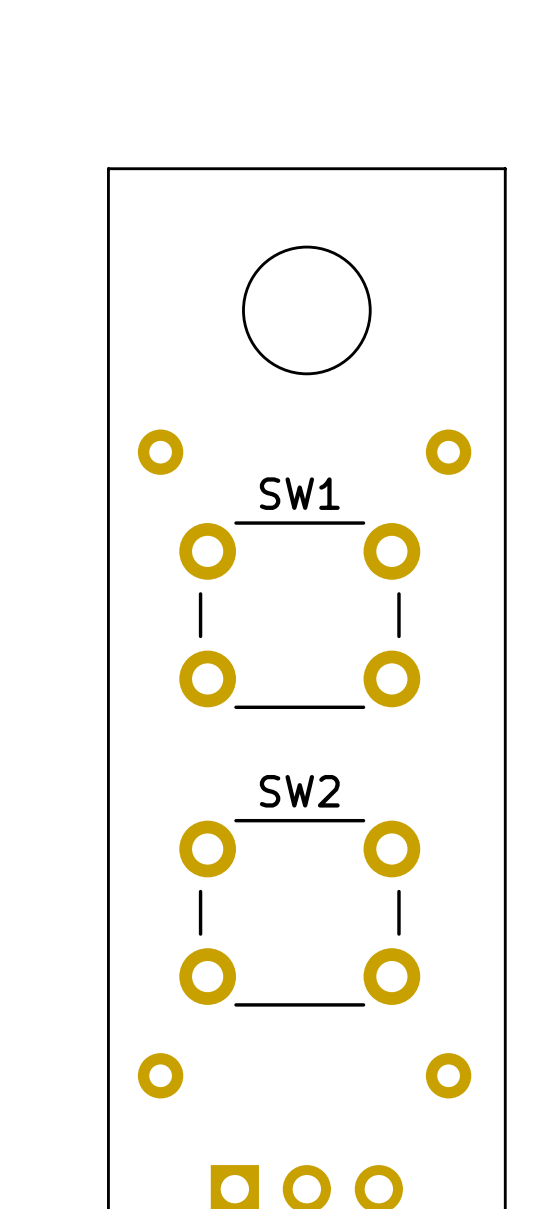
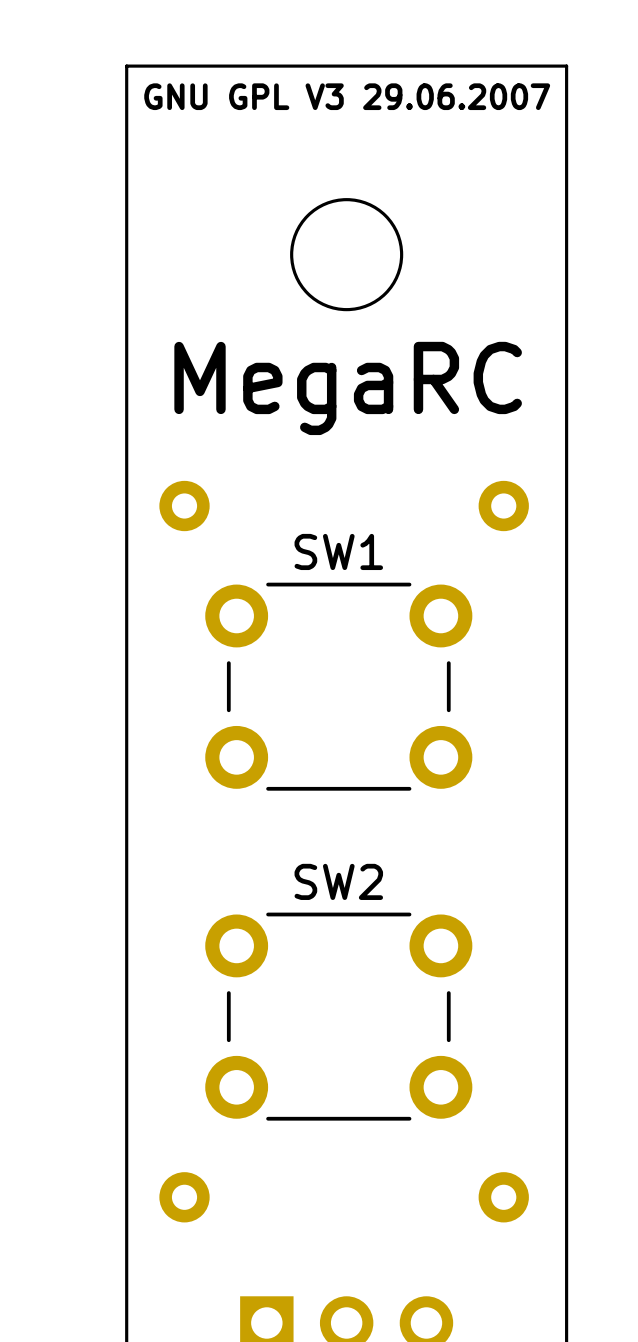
text: none -> GNU GPL V3 29.06.2007 (347, 96)
board edge: (108, 168) (505, 168) -> (126, 191) (126, 66) (566, 66) (566, 191)
round board edge: none -> [290, 198, 404, 312]
round board edge: [242, 245, 372, 376] -> none
text: none -> MegaRC (348, 388)

